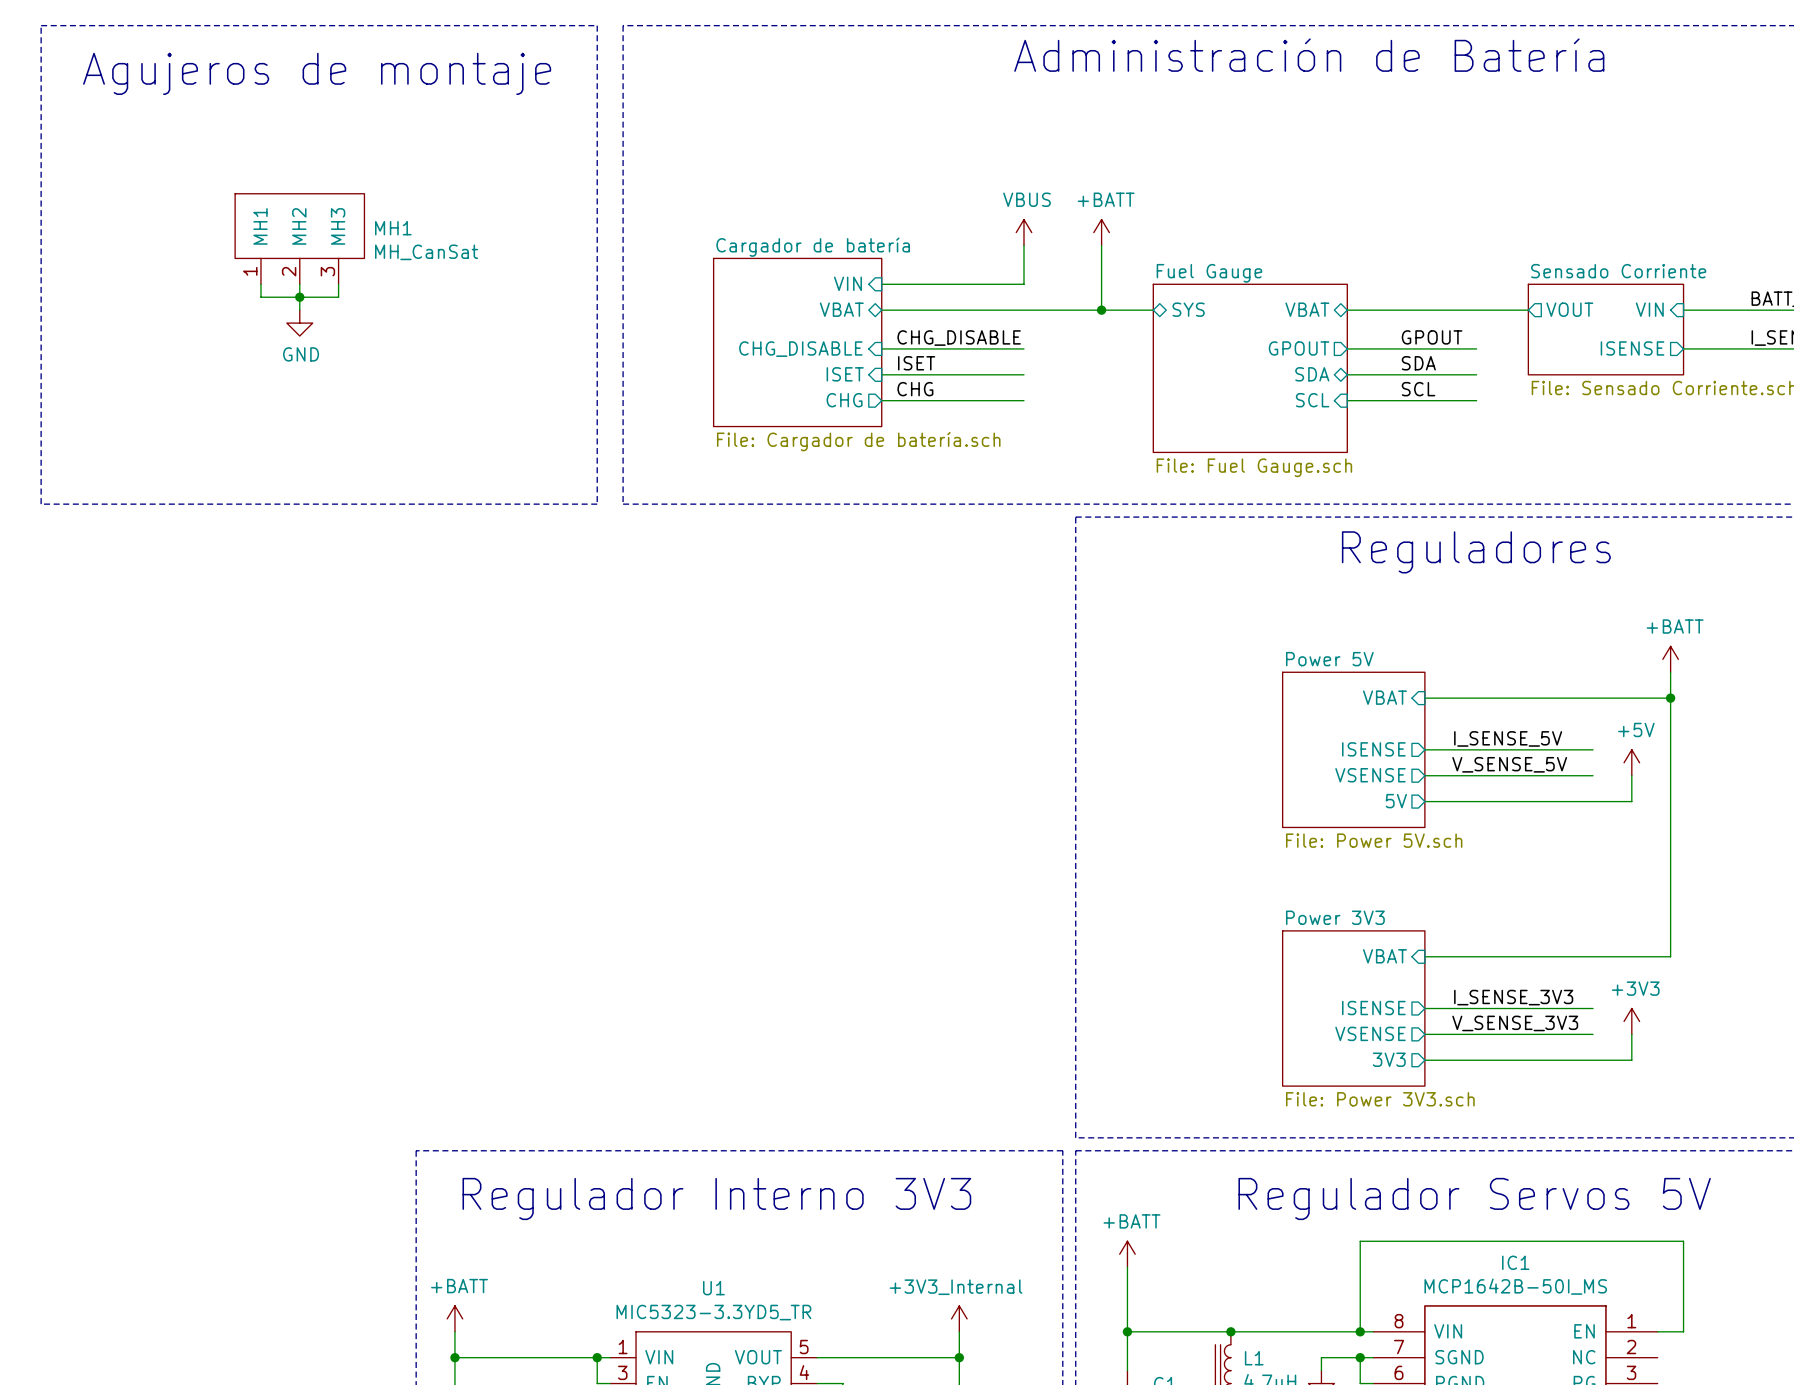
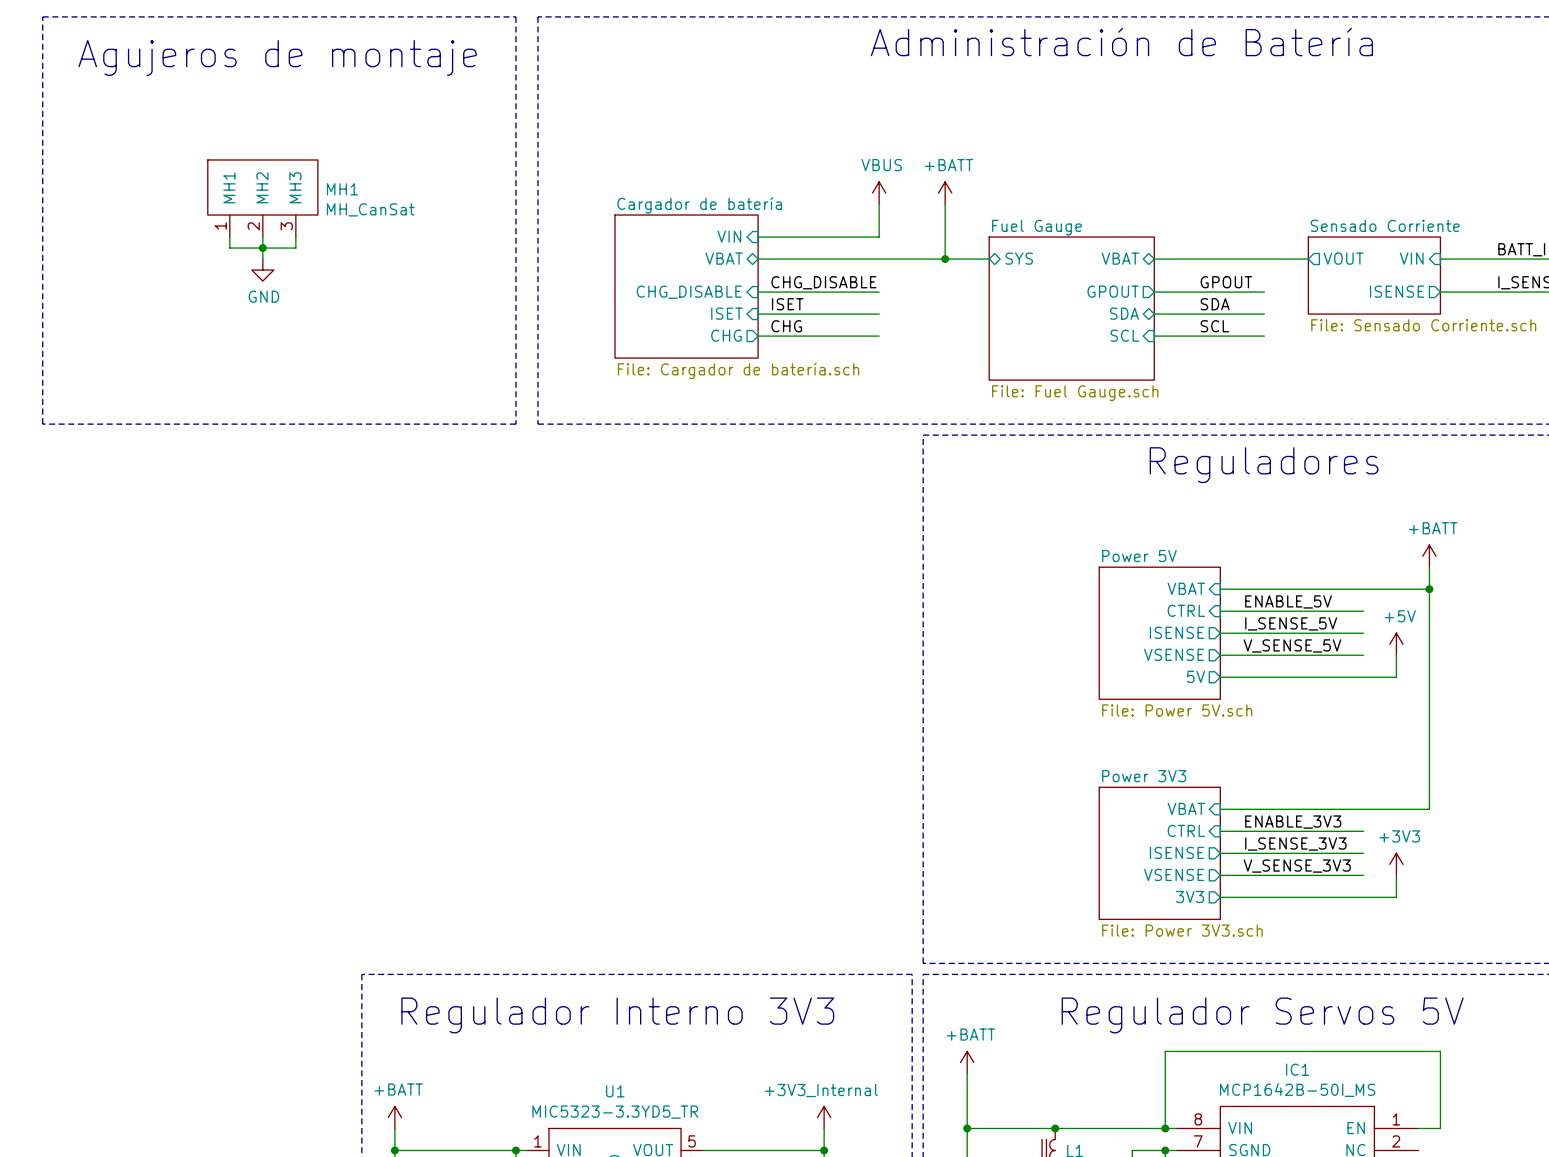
label: none -> ENABLE_5V (1288, 601)
sheet pin: none -> CTRL (1186, 610)
wire: none -> (1220, 611) (1363, 611)
label: none -> ENABLE_3V3 (1293, 822)
sheet pin: none -> CTRL (1186, 830)
wire: none -> (1220, 831) (1363, 831)

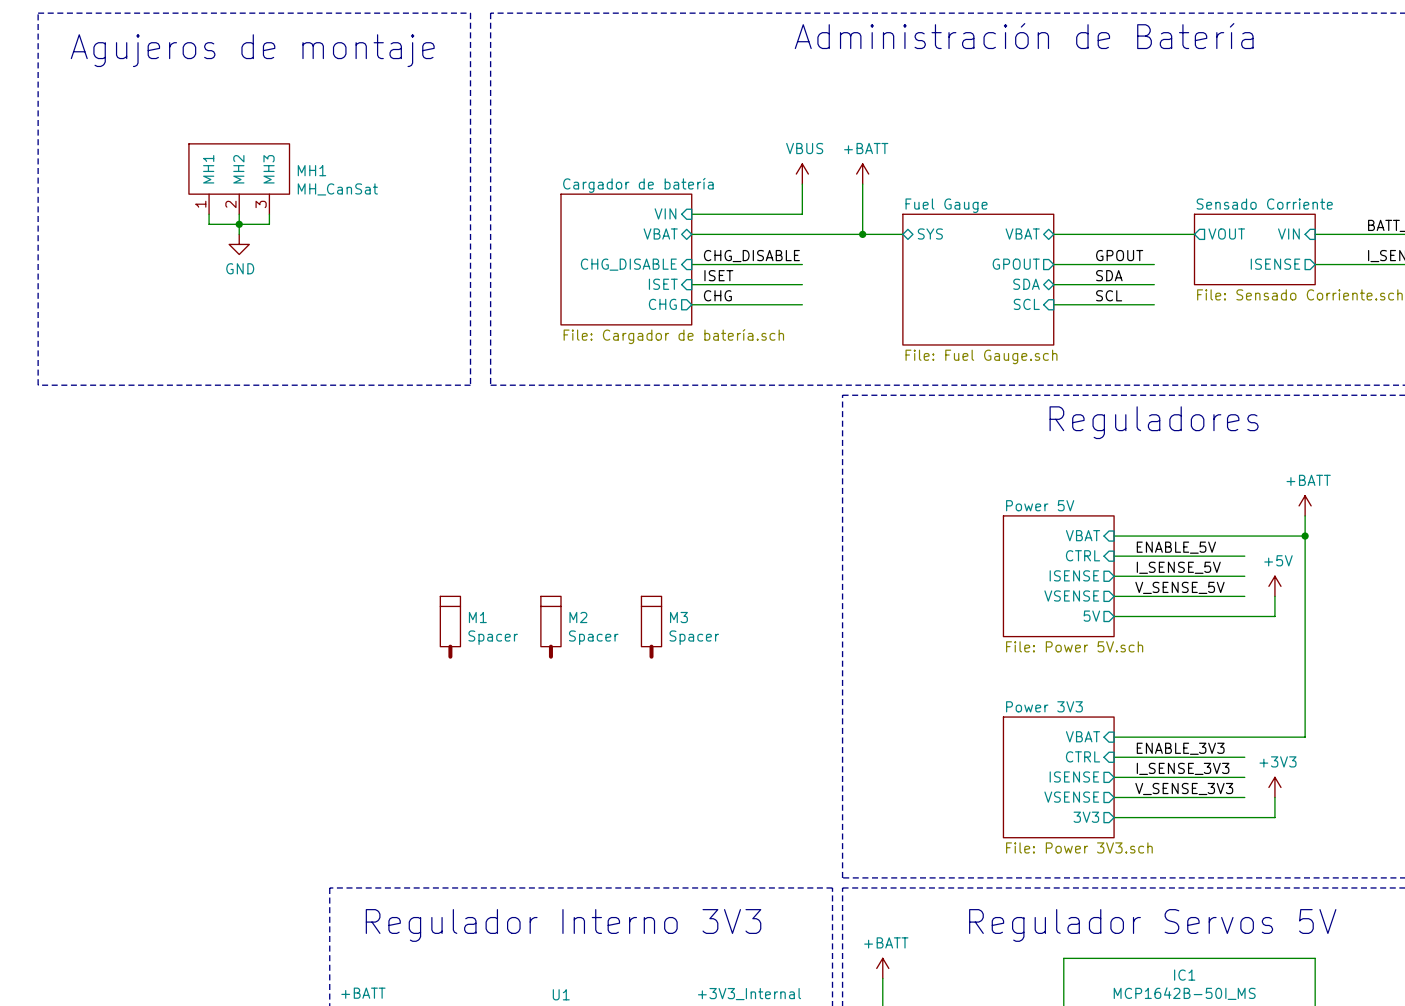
M1: none -> Spacer (450, 627)
M2: none -> Spacer (550, 627)
M3: none -> Spacer (651, 627)

